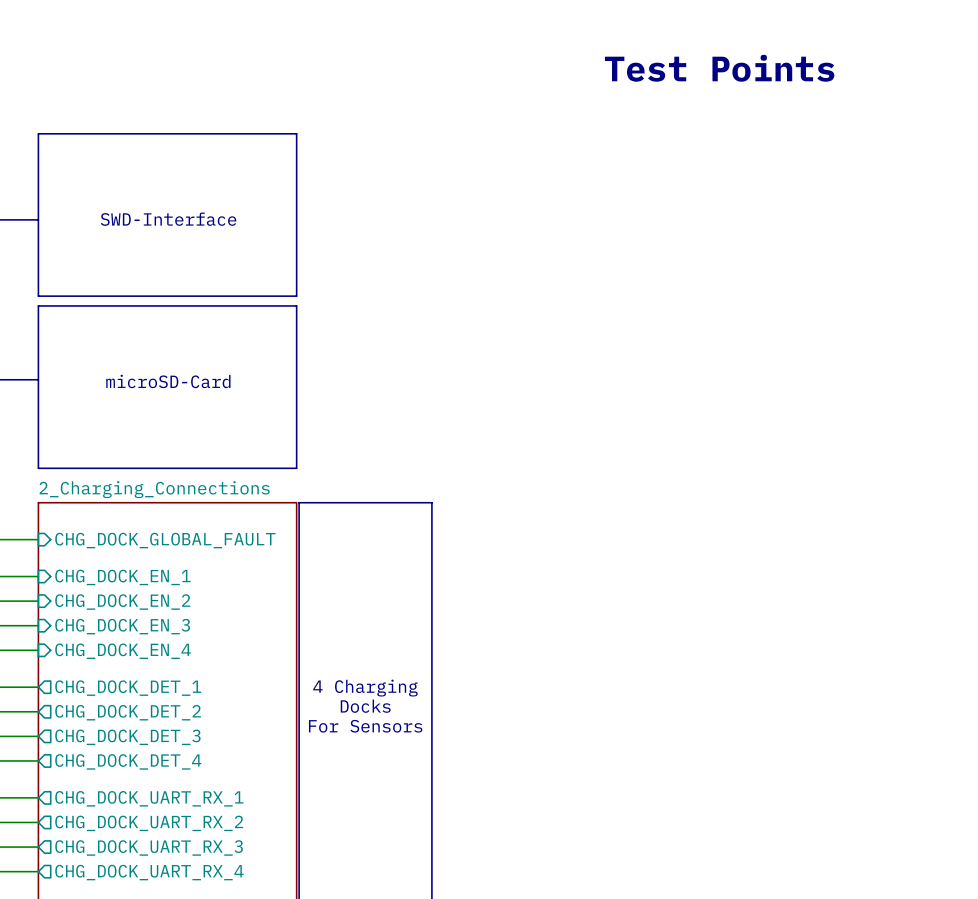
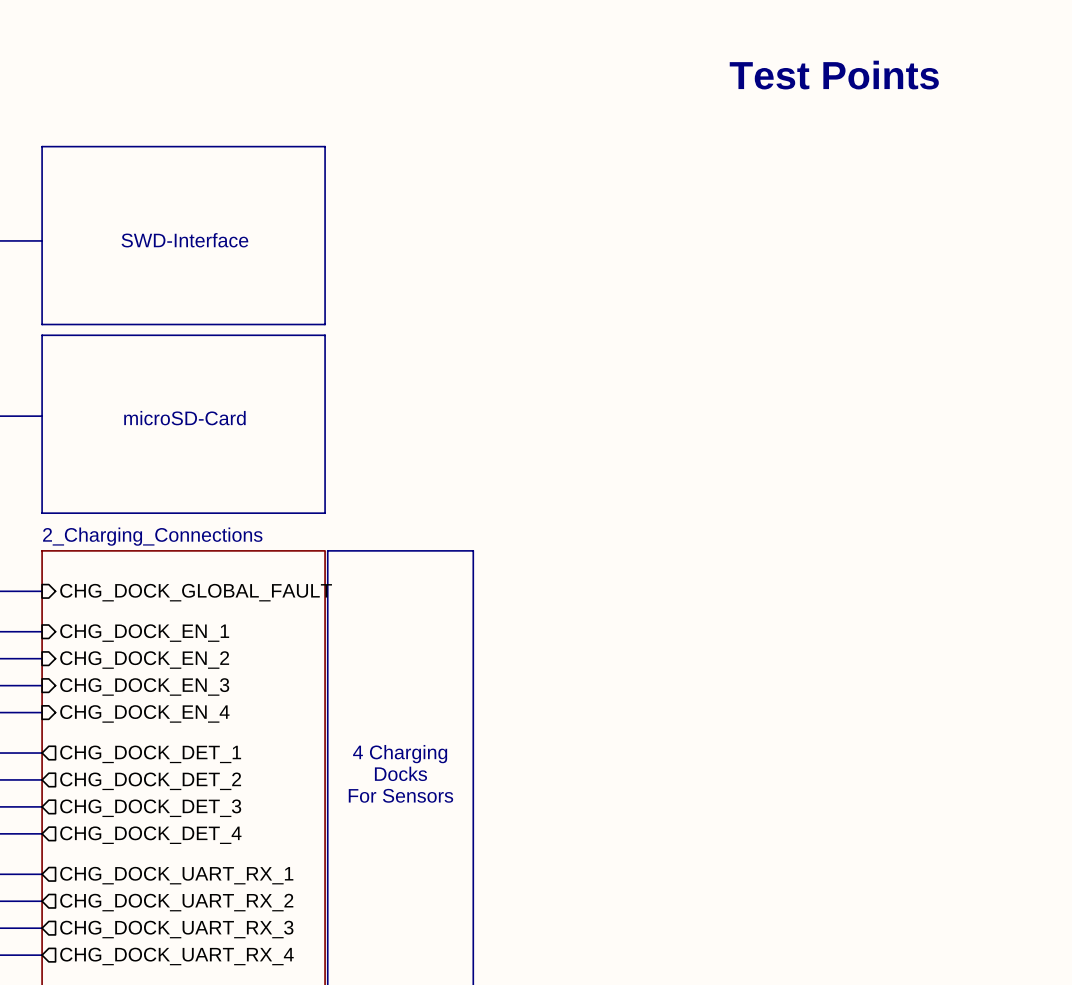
text position: Test Points (719, 68) -> Test Points (834, 75)

